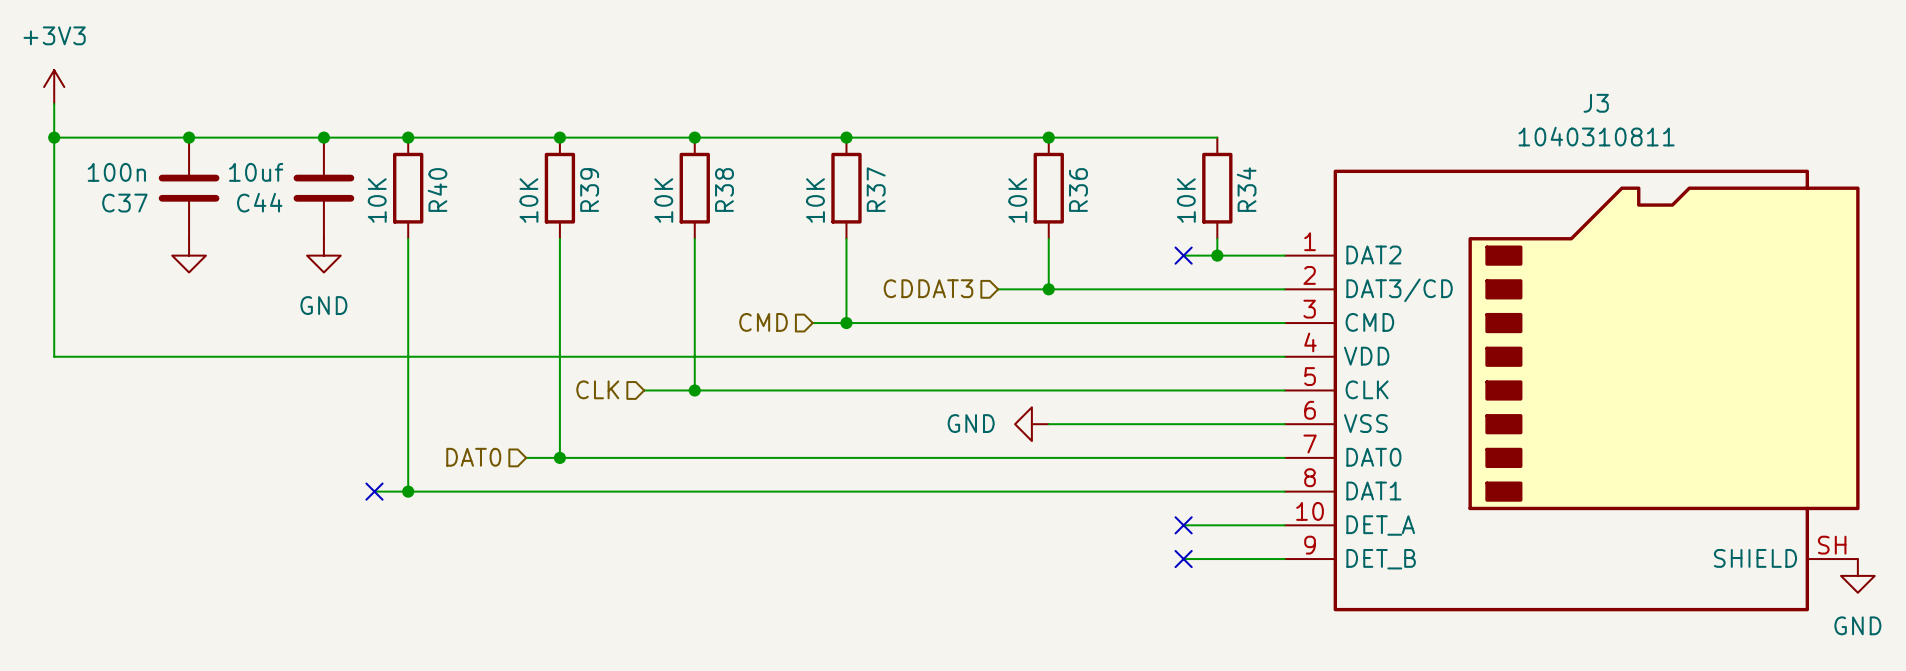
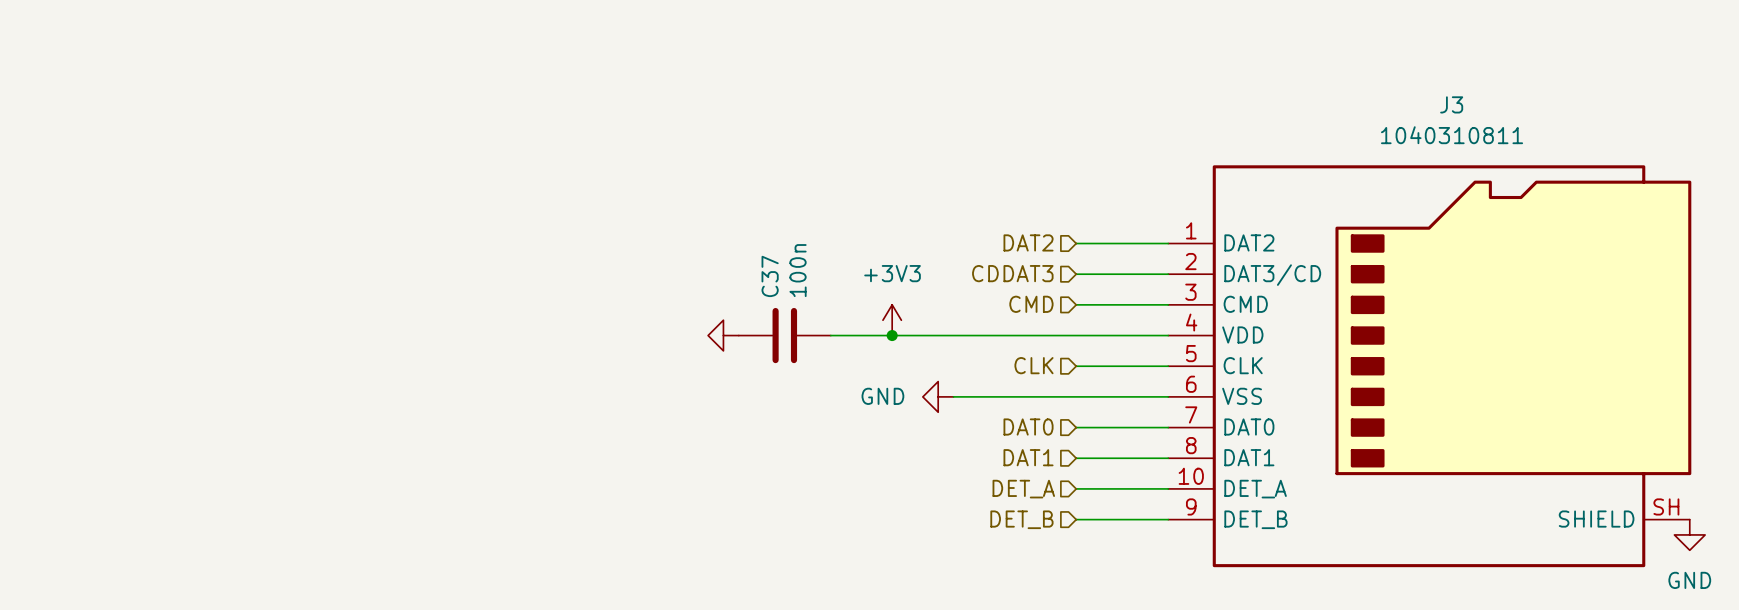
power symbol: +3V3 (54, 87) -> none
wire: (54, 103) (54, 356) (913, 356) -> none
wire: (54, 137) (1217, 137) -> none
junction: (54, 137) -> none
junction: (189, 137) -> none
junction: (323, 137) -> none
junction: (408, 137) -> none
junction: (559, 137) -> none
junction: (694, 137) -> none
junction: (846, 137) -> none
junction: (1048, 137) -> none
C37 rotation: 0° (189, 188) -> 90° clockwise (784, 335)
C37 position: (189, 188) -> (784, 335)
C44: 10uf (323, 188) -> none
R40: 10K (408, 188) -> none
R39: 10K (559, 188) -> none
R38: 10K (694, 188) -> none
R37: 10K (846, 188) -> none
R36: 10K (1048, 188) -> none
R34: 10K (1217, 188) -> none
wire: (408, 238) (408, 491) -> none
wire: (559, 238) (559, 457) -> none
wire: (694, 238) (694, 390) -> none
wire: (846, 238) (846, 323) -> none
wire: (1048, 238) (1048, 289) -> none
wire: (1217, 238) (1217, 255) -> none
hierarchical label: none -> DAT2 (1028, 242)
power symbol: (189, 255) -> none
power symbol: GND (323, 255) -> none
no-connect mark: (1183, 255) -> none
junction: (1217, 255) -> none
hierarchical label position: CDDAT3 (928, 288) -> CDDAT3 (1012, 273)
wire: (998, 289) (1183, 289) -> none
junction: (1048, 289) -> none
hierarchical label: CMD (763, 322) -> none
hierarchical label: none -> CMD (1031, 304)
wire: (812, 323) (1183, 323) -> none
junction: (846, 323) -> none
power symbol: none -> +3V3 (892, 320)
power symbol: none -> (723, 335)
junction: none -> (892, 335)
hierarchical label: CLK (597, 389) -> none
hierarchical label: none -> CLK (1033, 365)
wire: (644, 390) (1183, 390) -> none
junction: (694, 390) -> none
hierarchical label: DAT0 (473, 457) -> none
wire: (526, 457) (1183, 457) -> none
junction: (559, 457) -> none
hierarchical label: none -> DAT0 (1028, 427)
hierarchical label: none -> DAT1 (1028, 457)
wire: (374, 491) (1183, 491) -> none
no-connect mark: (374, 491) -> none
junction: (408, 491) -> none
hierarchical label: none -> DET_A (1023, 489)
no-connect mark: (1183, 525) -> none
hierarchical label: none -> DET_B (1021, 519)
no-connect mark: (1183, 559) -> none

